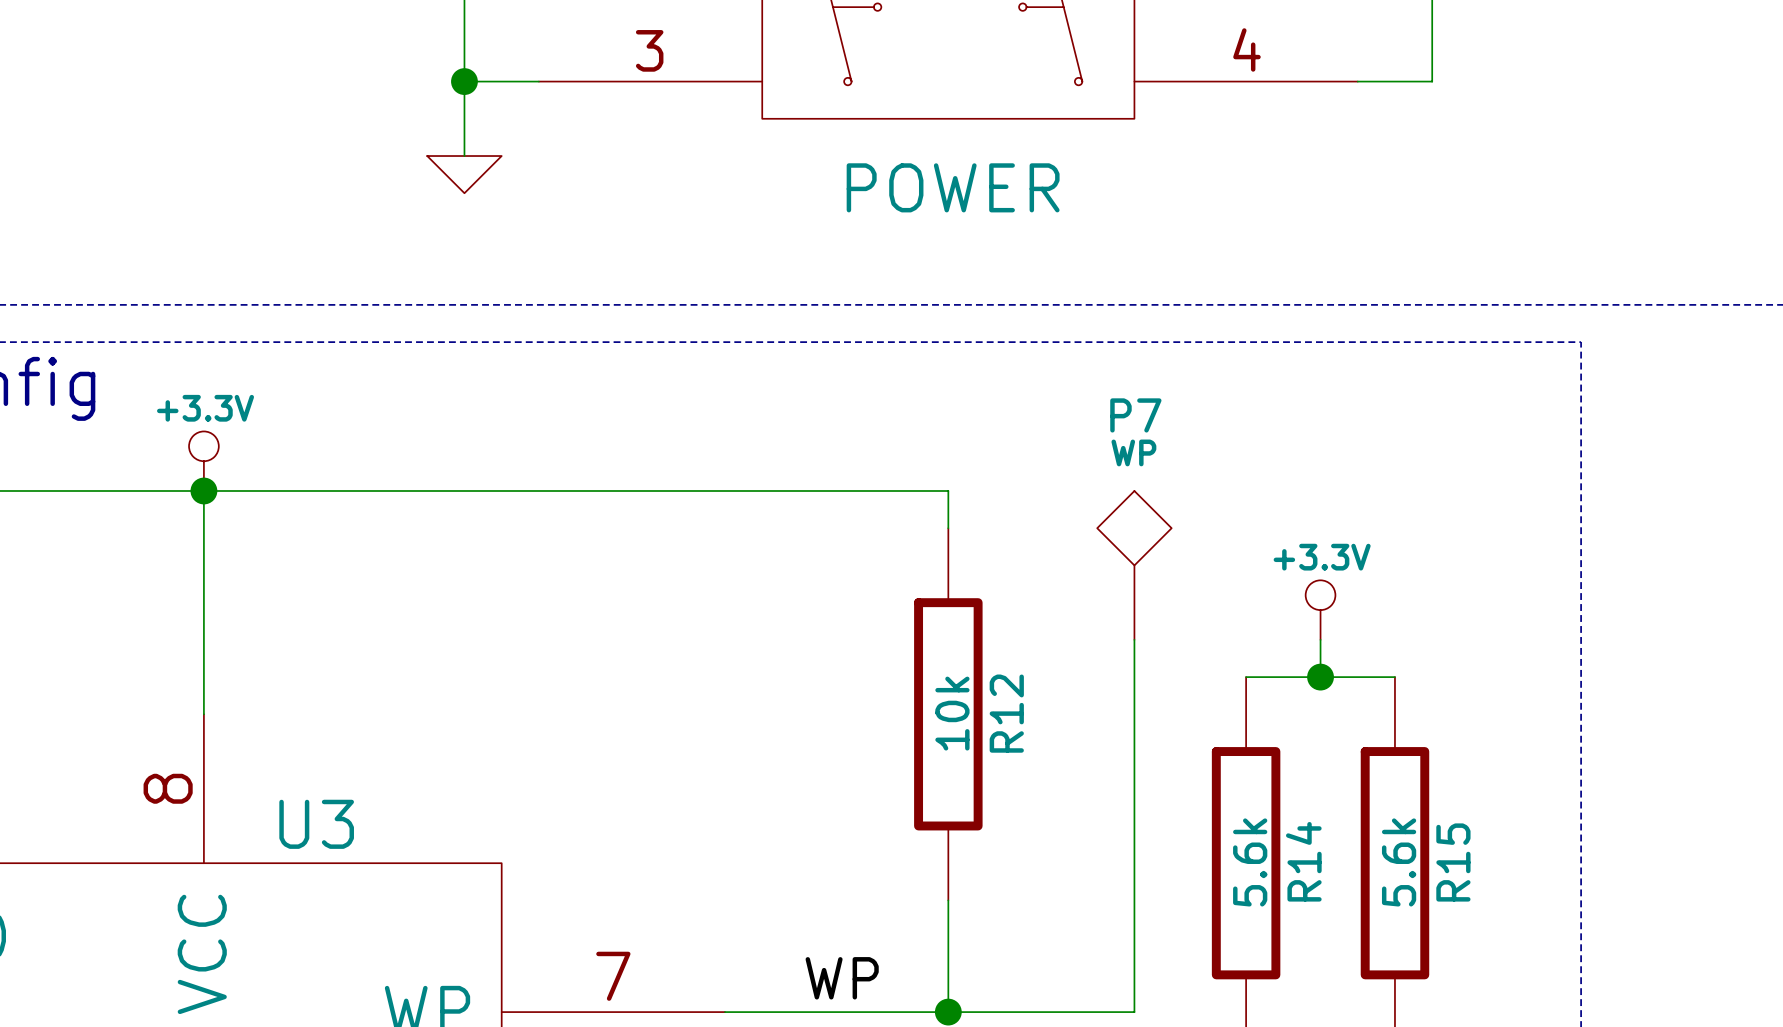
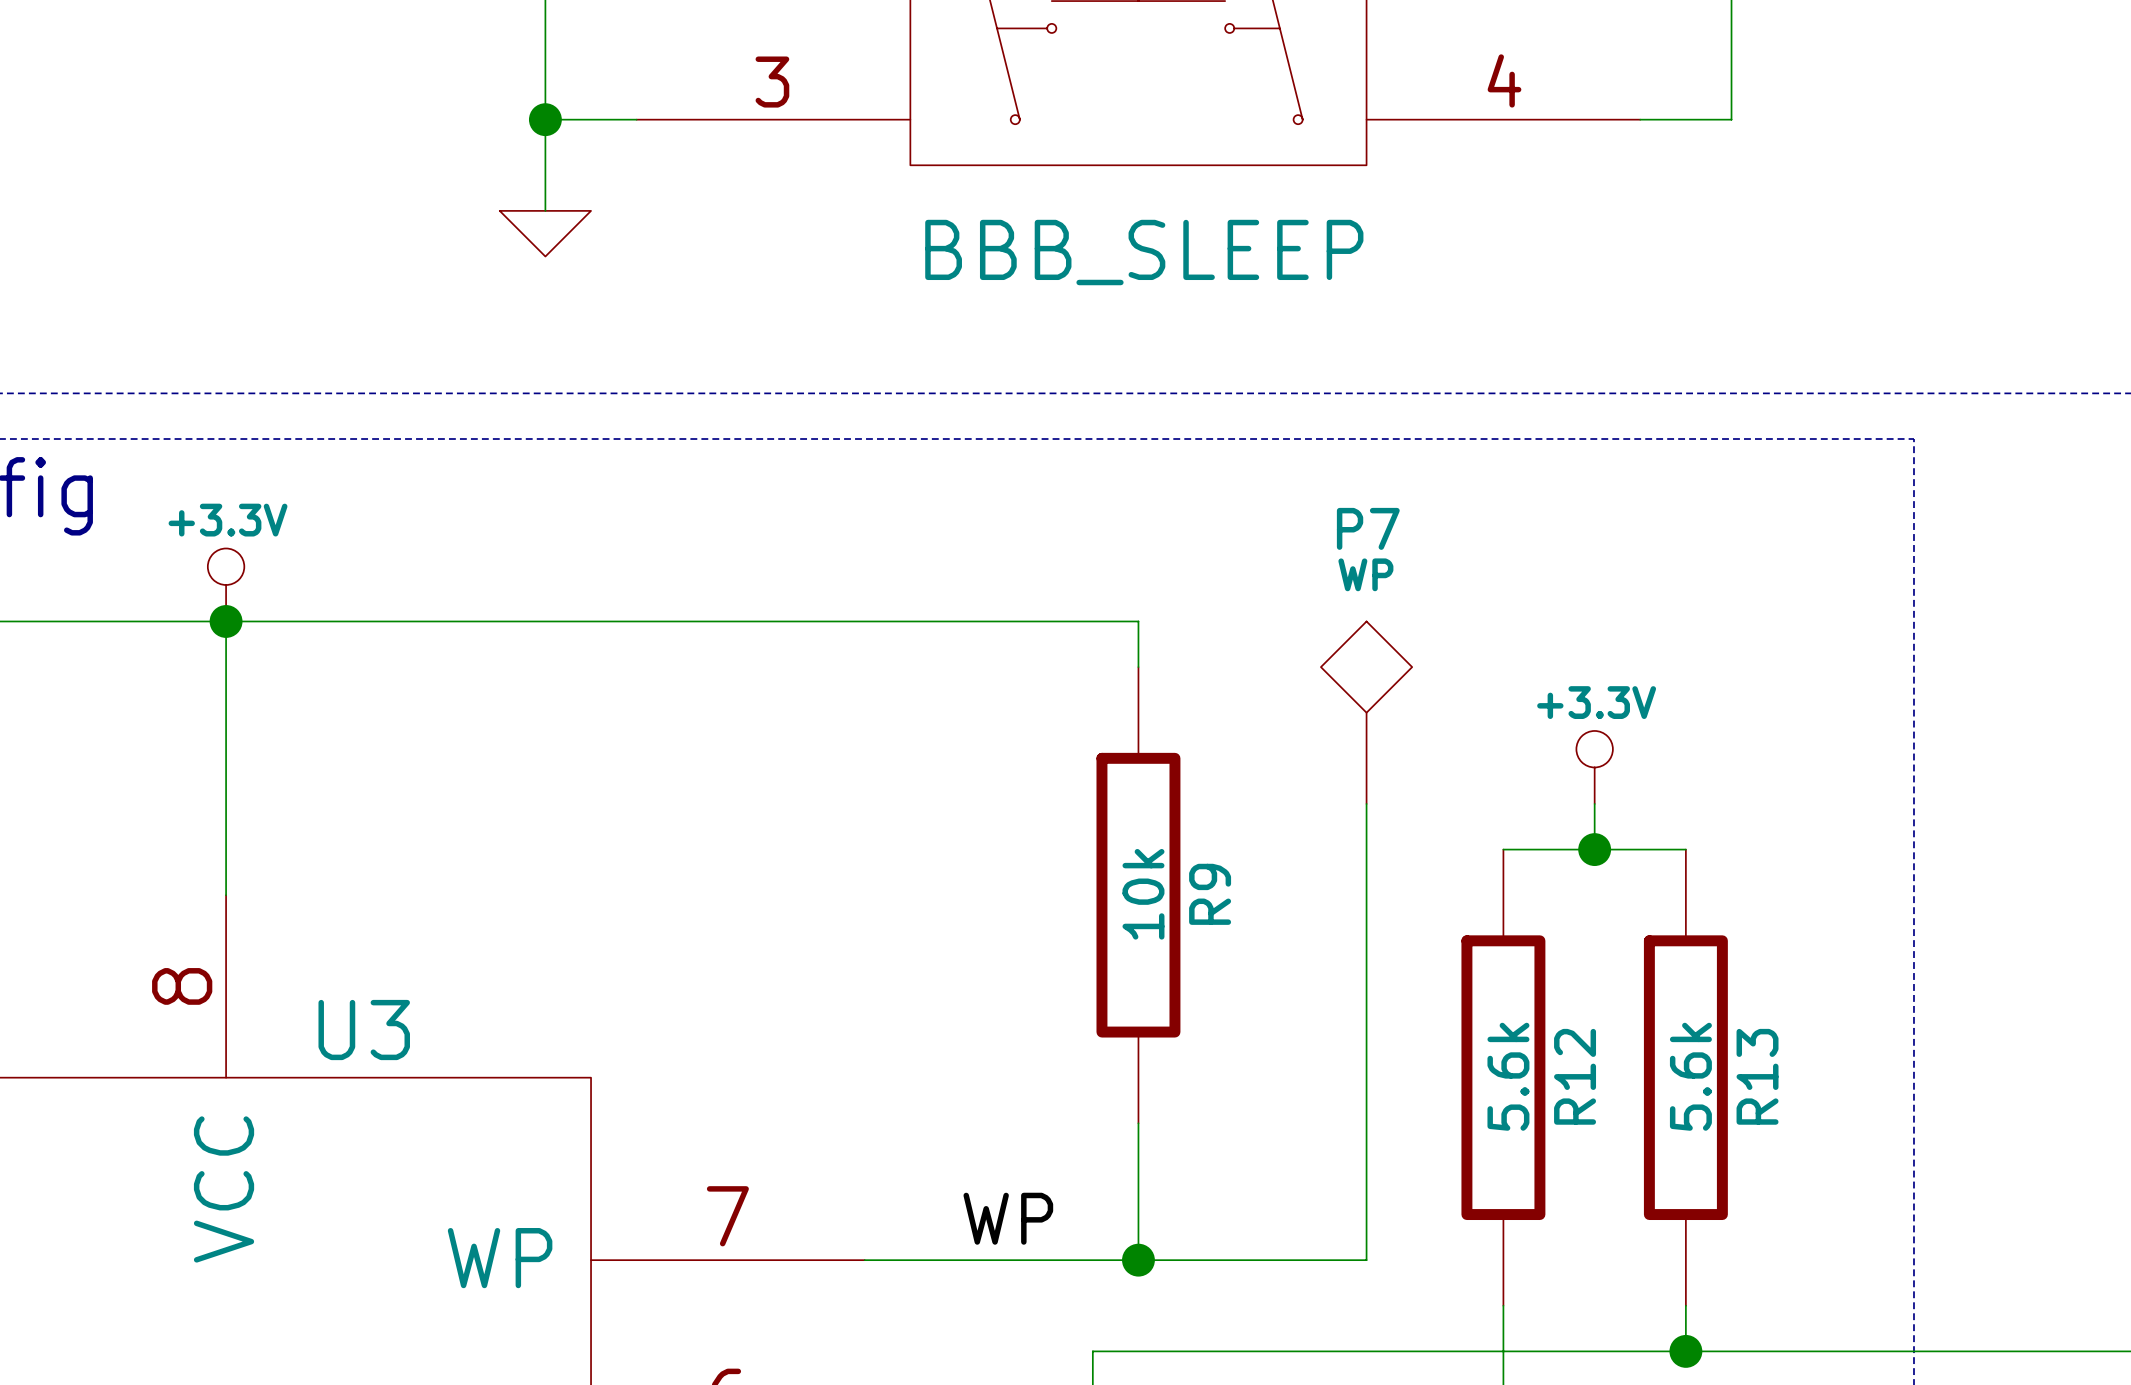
part value: POWER (953, 187) -> BBB_SLEEP (1144, 252)
R12 name: R12 (1006, 713) -> R9 (1210, 894)
R14 name: R14 (1303, 861) -> R12 (1575, 1076)
R15 name: R15 (1453, 862) -> R13 (1757, 1076)

